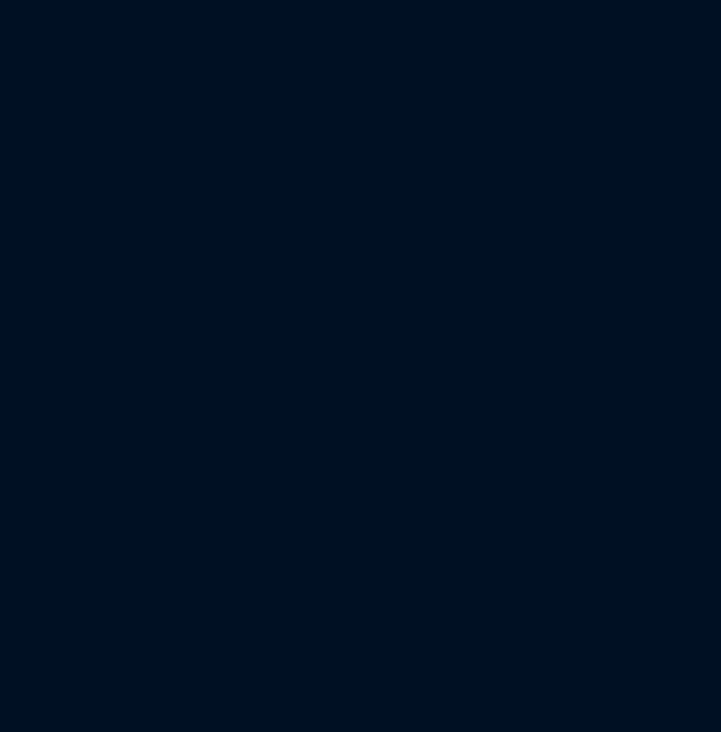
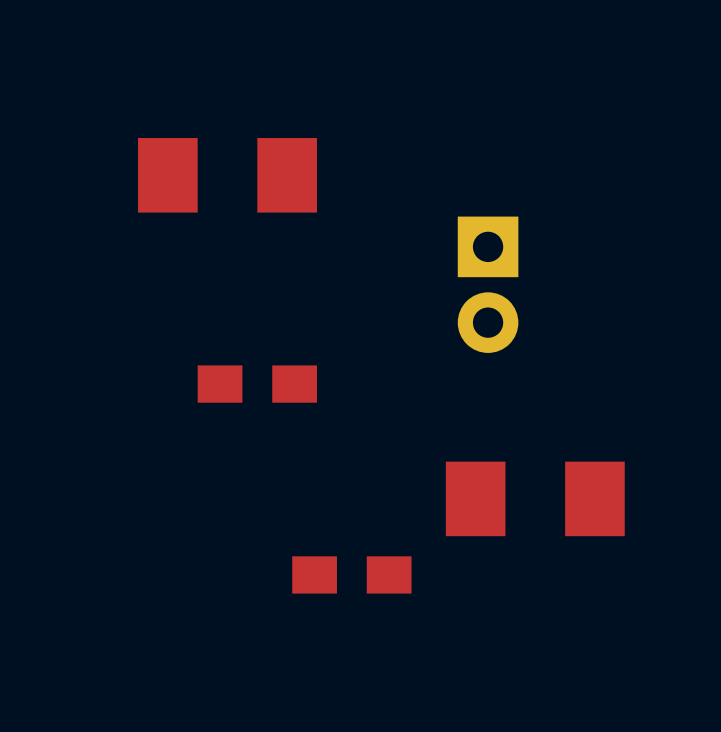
part: none -> (227, 175)
part: none -> (488, 284)
part: none -> (257, 384)
part: none -> (535, 498)
part: none -> (351, 574)

